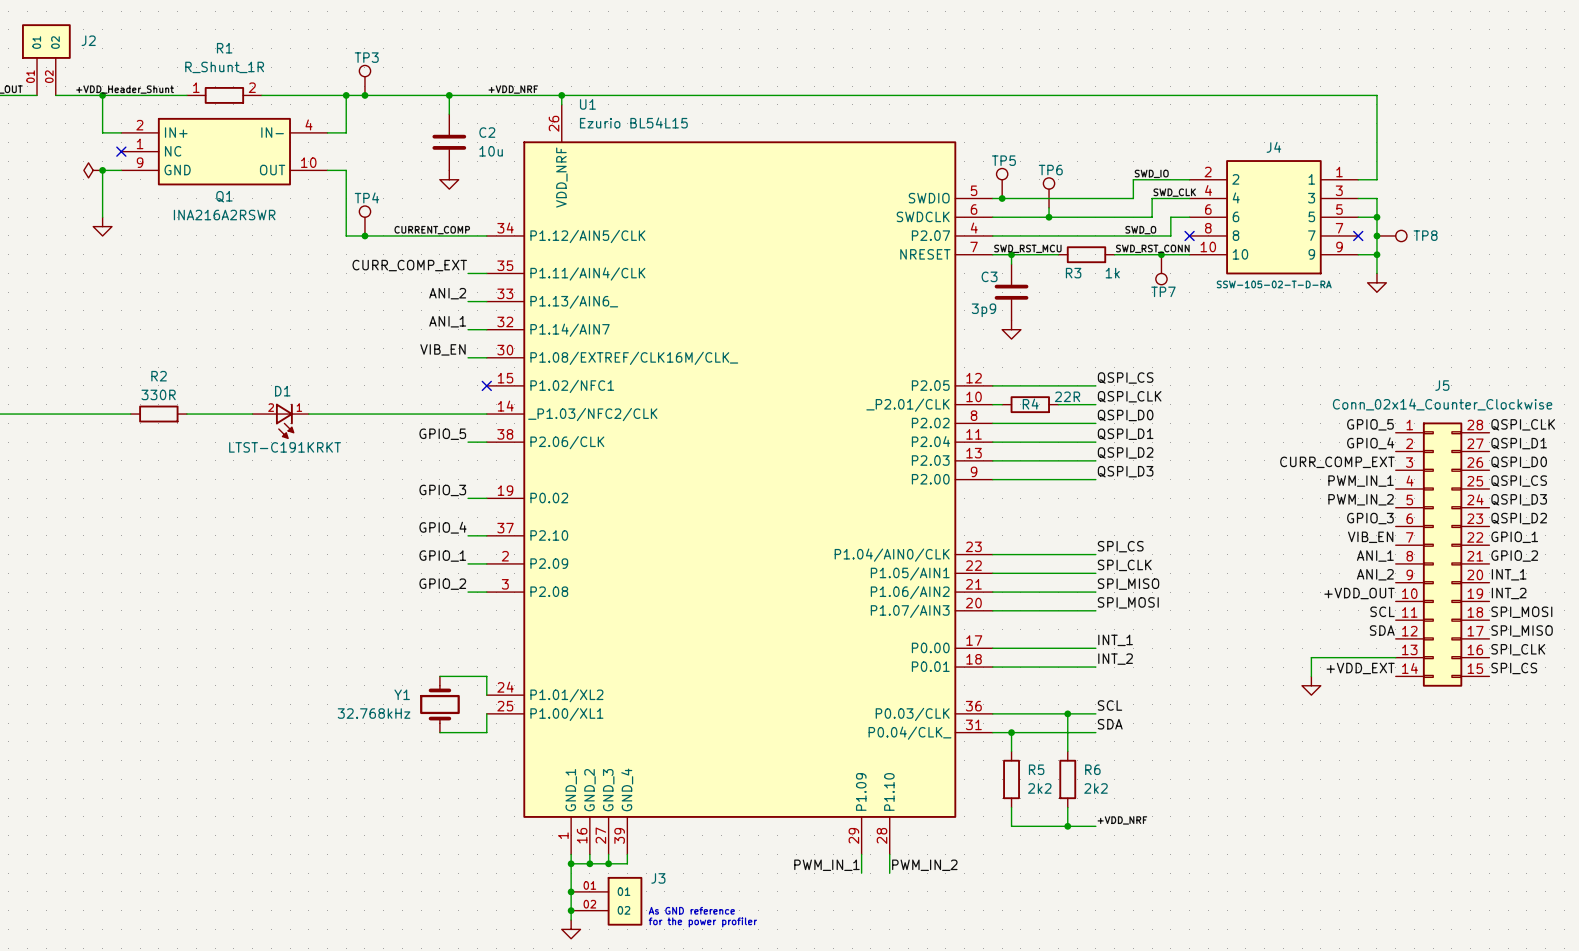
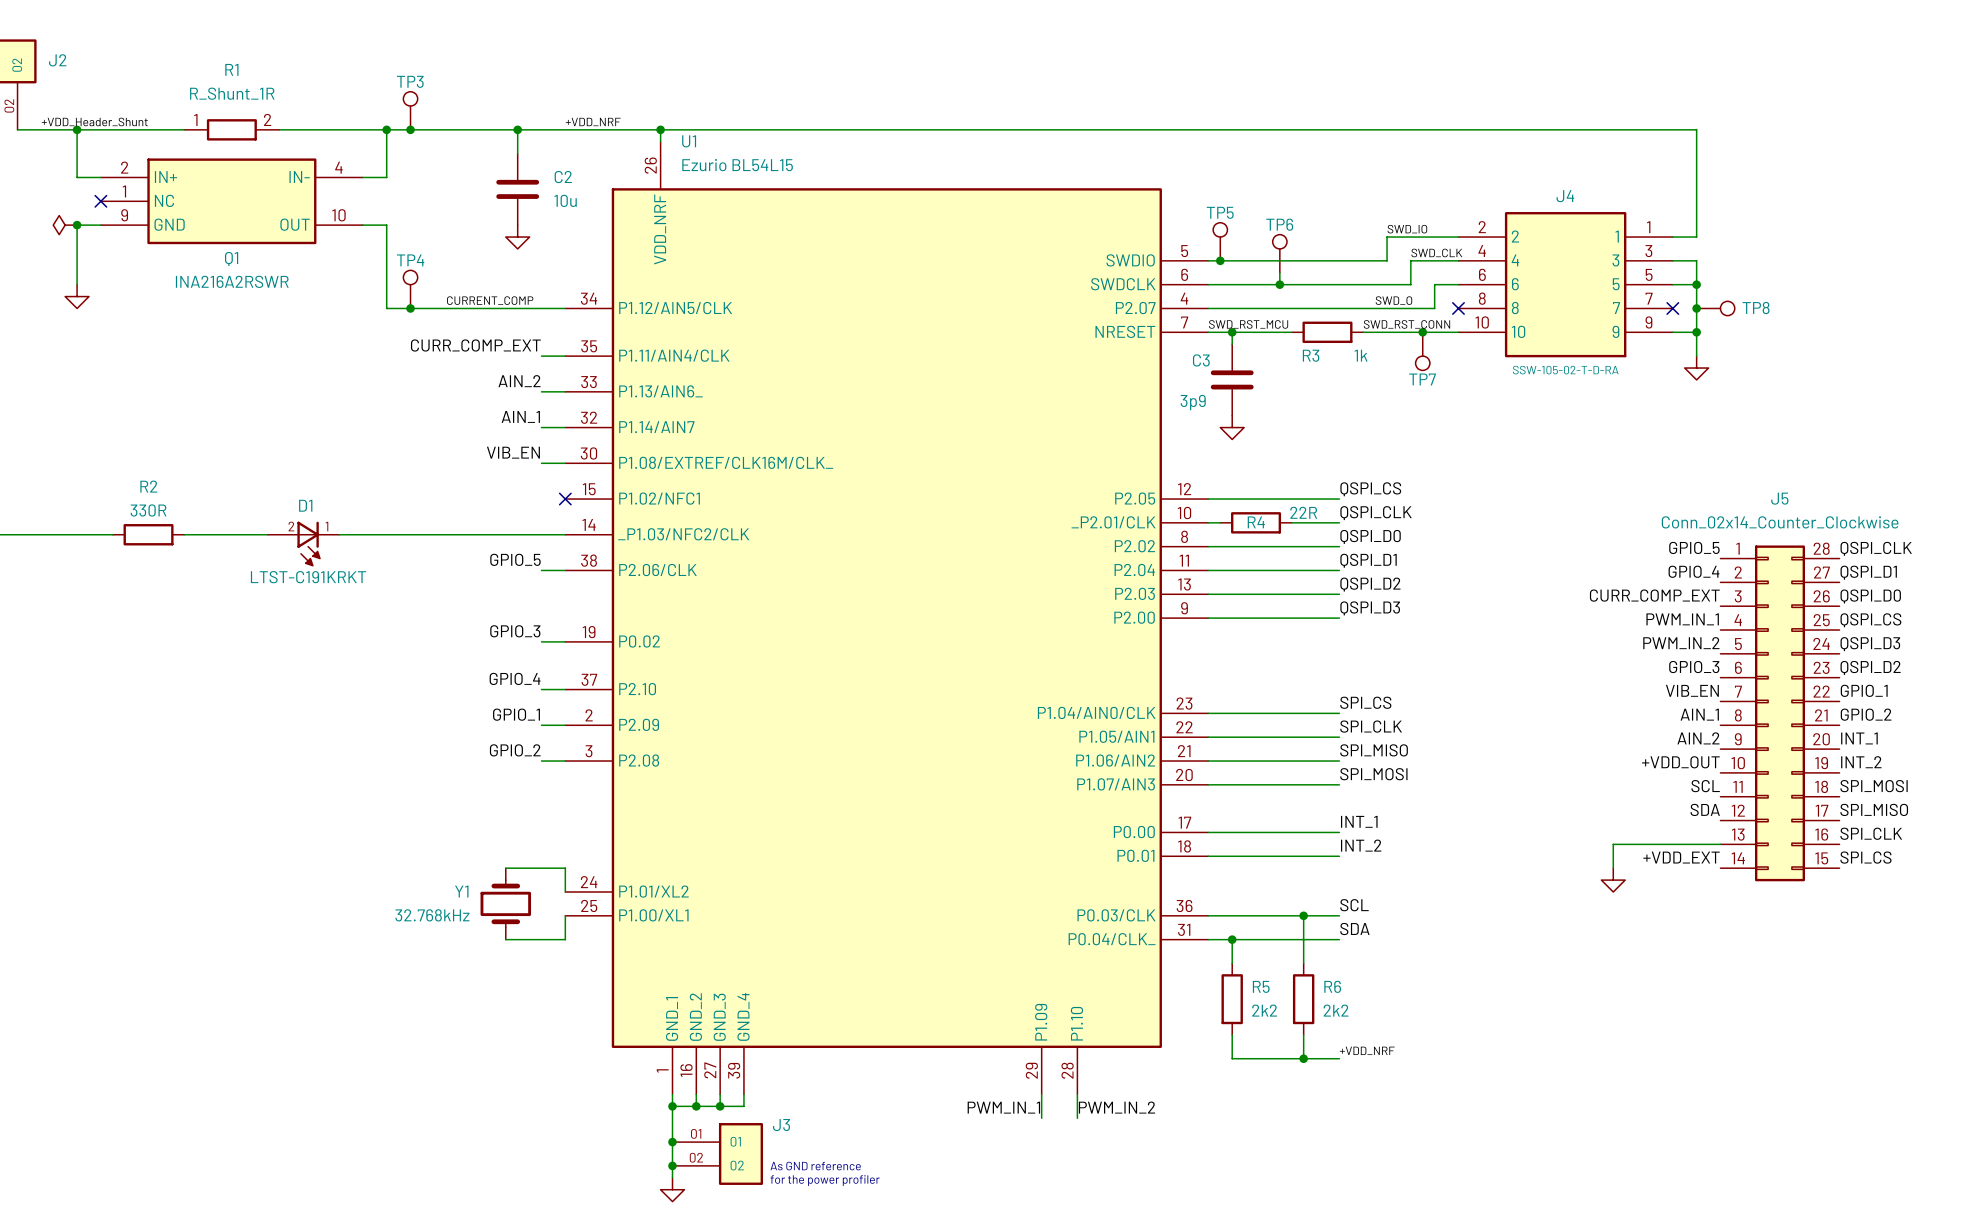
label: ANI_2 (447, 293) -> AIN_2 (519, 381)
label: ANI_1 (447, 321) -> AIN_1 (520, 416)
label: ANI_1 (1375, 556) -> AIN_1 (1699, 714)
label: ANI_2 (1375, 574) -> AIN_2 (1698, 738)

